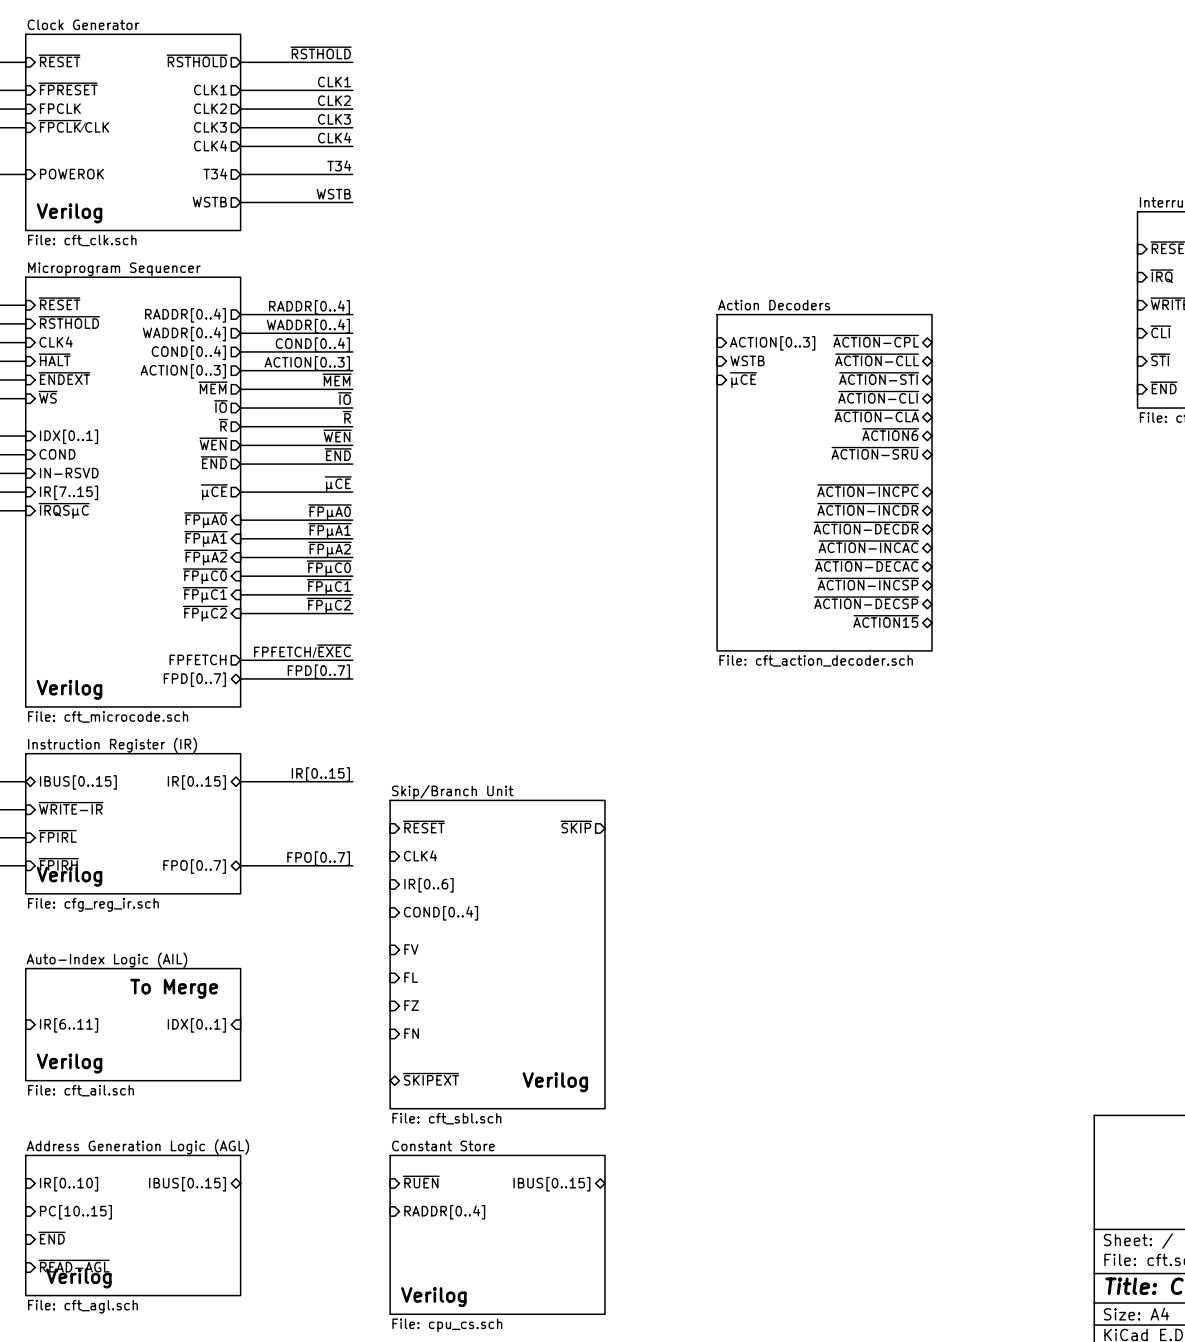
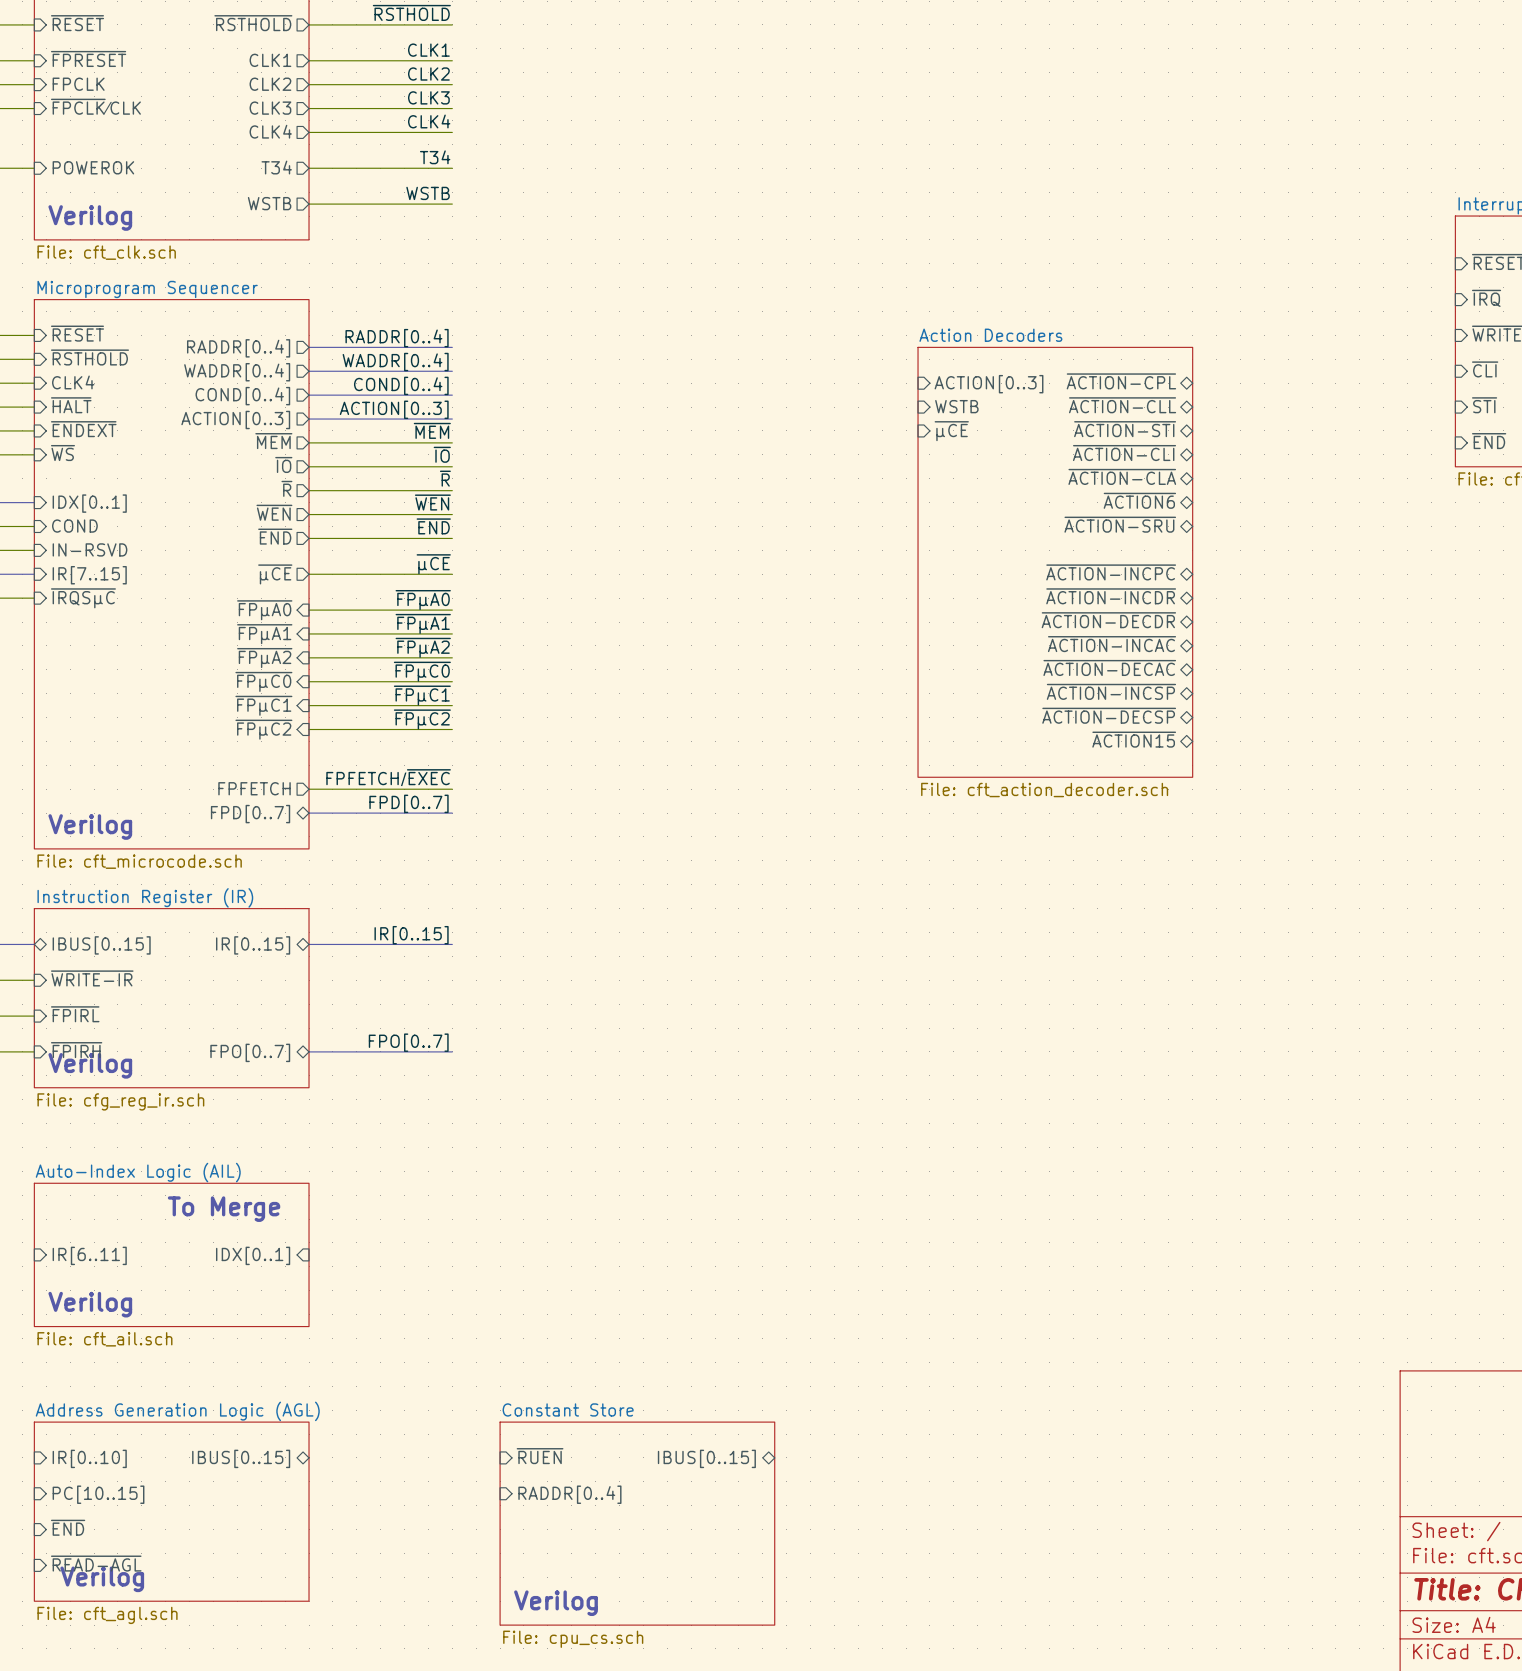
sheet pin: ~{RESET} (423, 827) -> none
sheet pin: ~{SKIP} (576, 827) -> none
sheet pin: CLK4 (420, 855) -> none
sheet pin: IR[0..6] (428, 885) -> none
sheet pin: COND[0..4] (440, 913) -> none
sheet pin: FV (411, 949) -> none
sheet Skip/Branch Unit: File: cft_sbl.sch (497, 954) -> none
sheet pin: FL (411, 977) -> none
sheet pin: FZ (411, 1005) -> none
sheet pin: FN (411, 1033) -> none
sheet pin: ~{SKIPEXT} (430, 1079) -> none
text: Verilog (555, 1082) -> none

